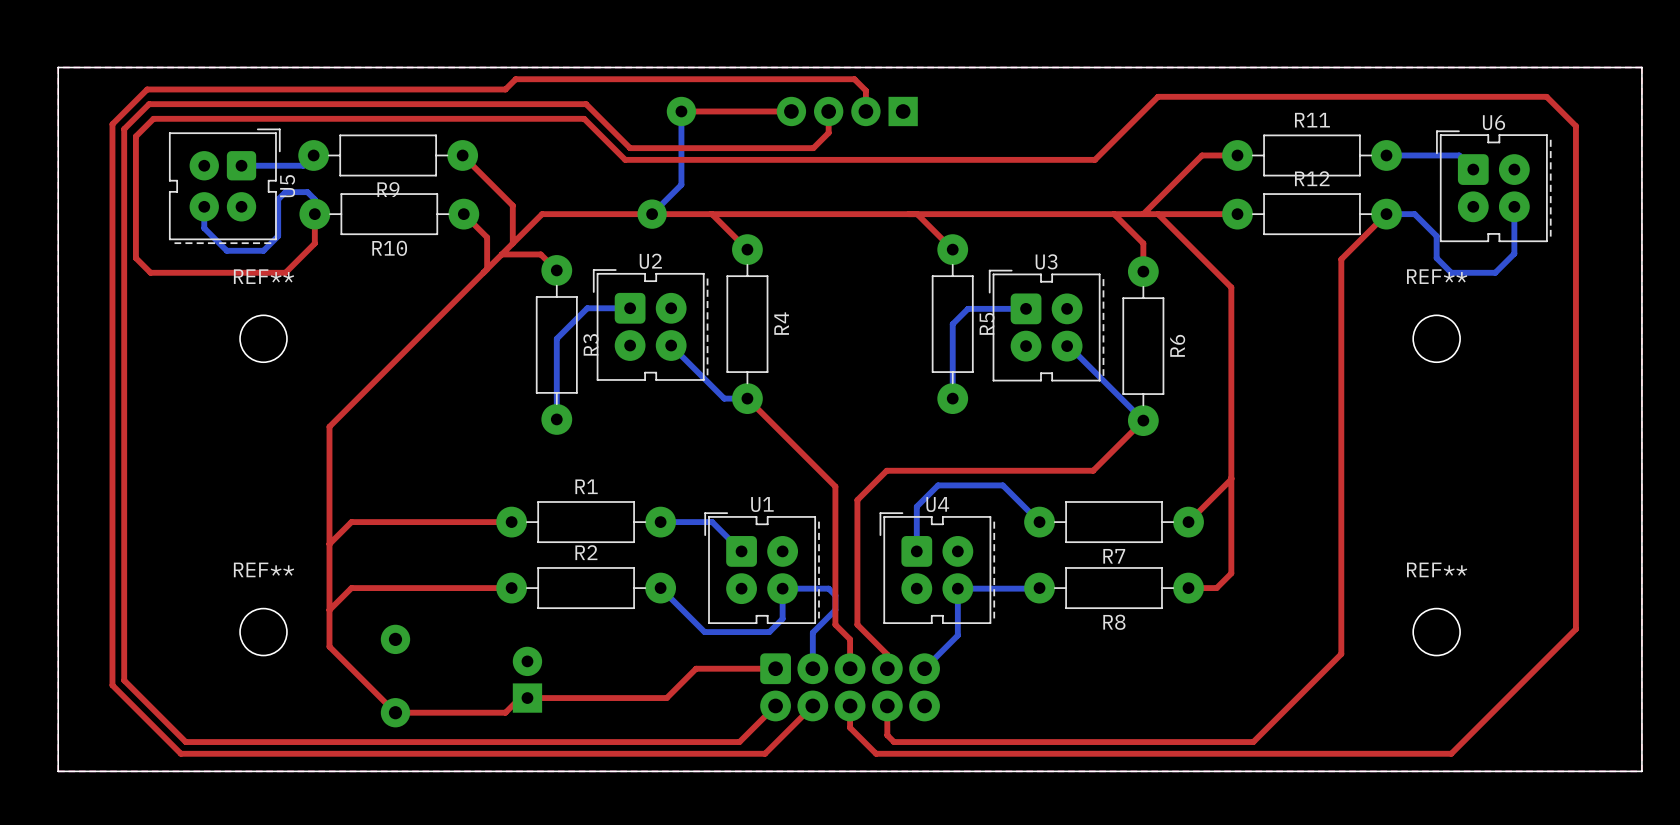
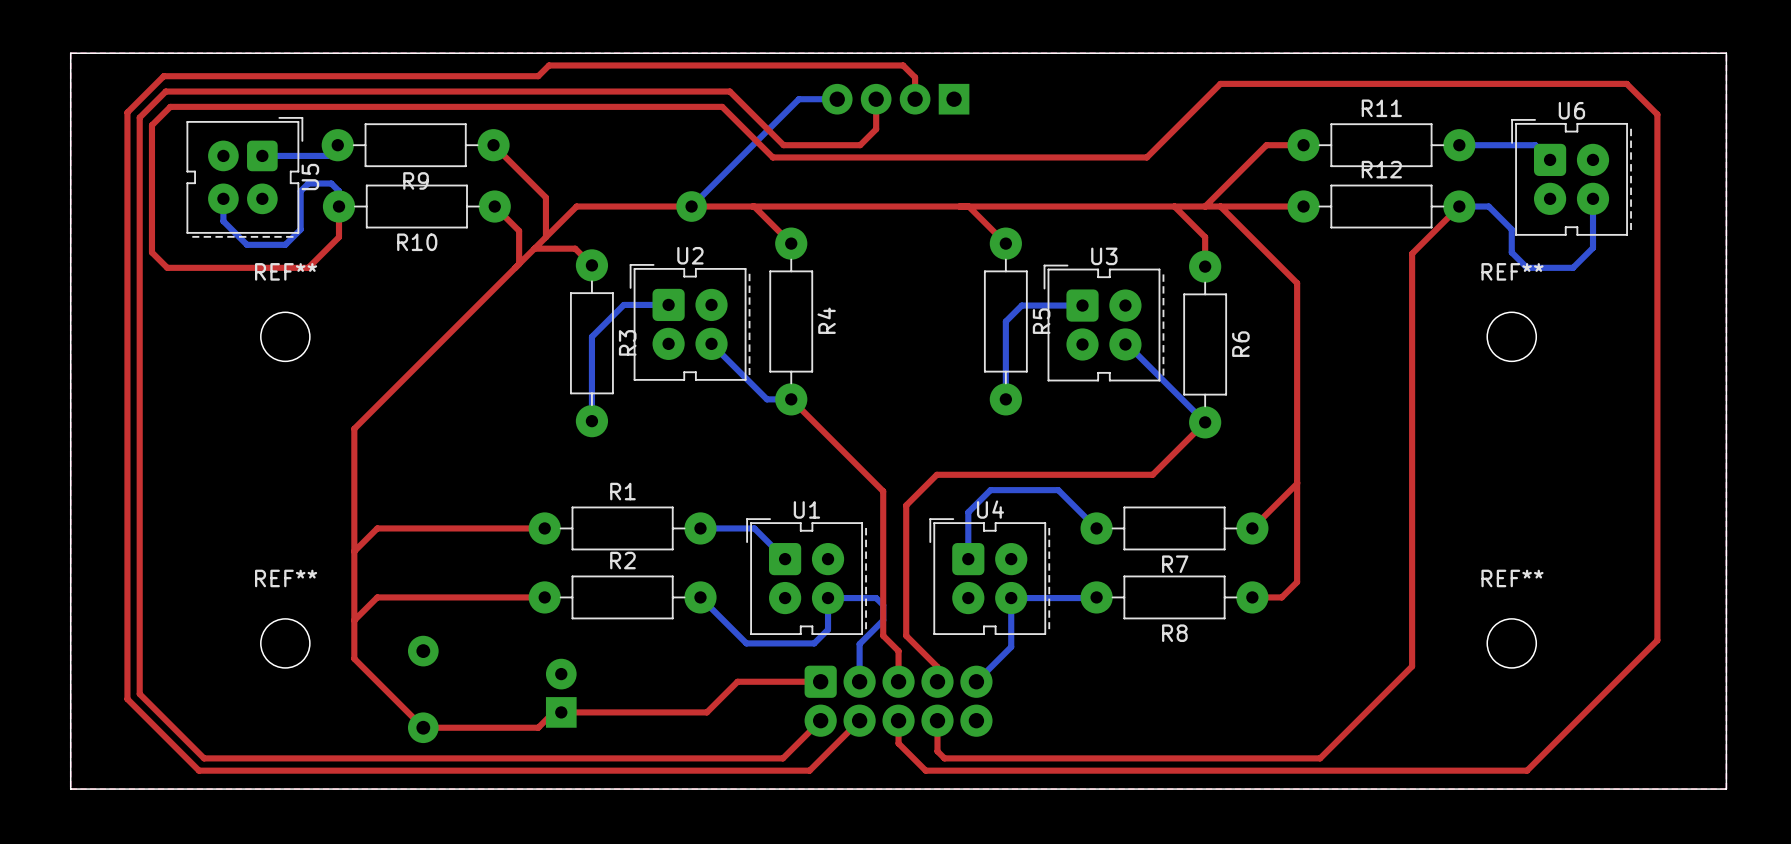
top track: (586, 104) (630, 148) (813, 148) (828, 132) -> (622, 91) (729, 91) (783, 145) (860, 145) (876, 129) (876, 121)
top track: (681, 111) (791, 111) -> none
bottom track: (681, 111) (681, 184) -> (837, 99) (798, 99) (722, 175)
via: (681, 111) -> none
top track: (584, 118) (625, 159) (1094, 159) -> (620, 106) (722, 106) (772, 157) (1146, 157) (1154, 149)

